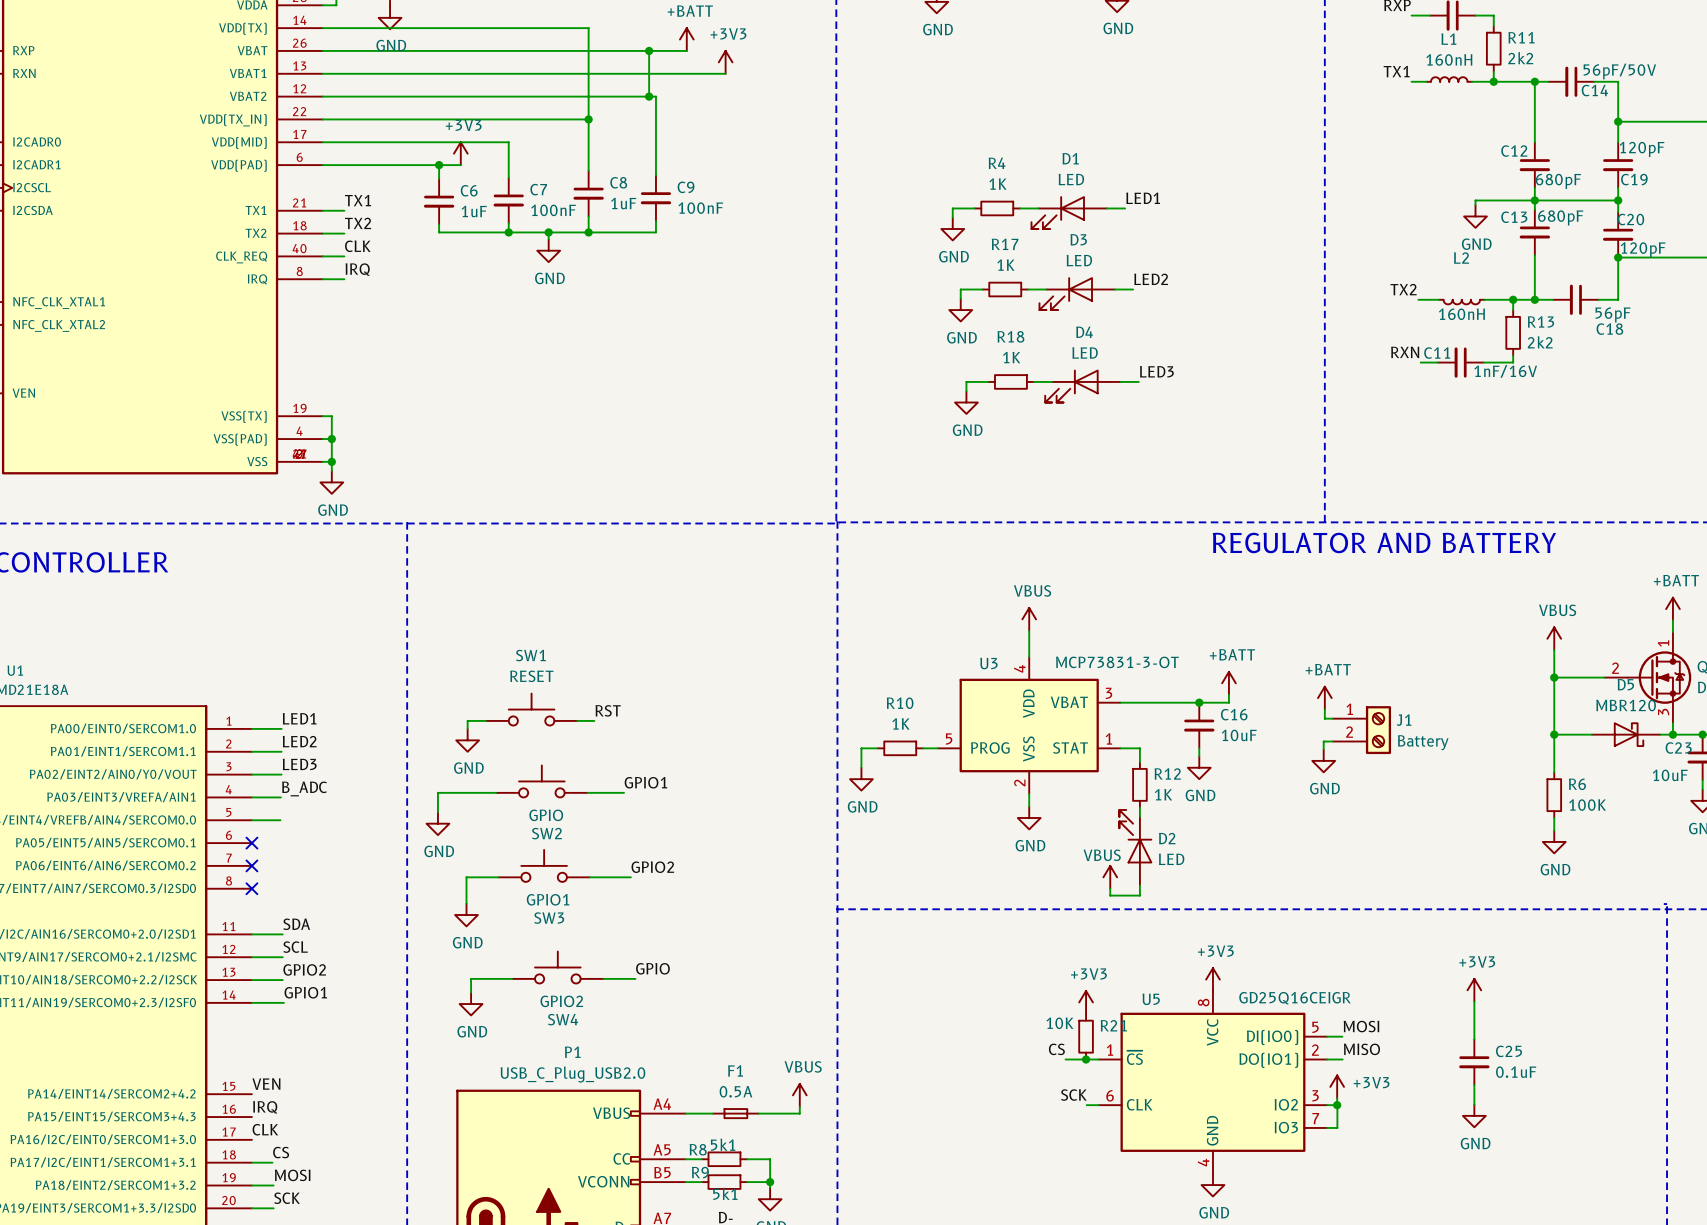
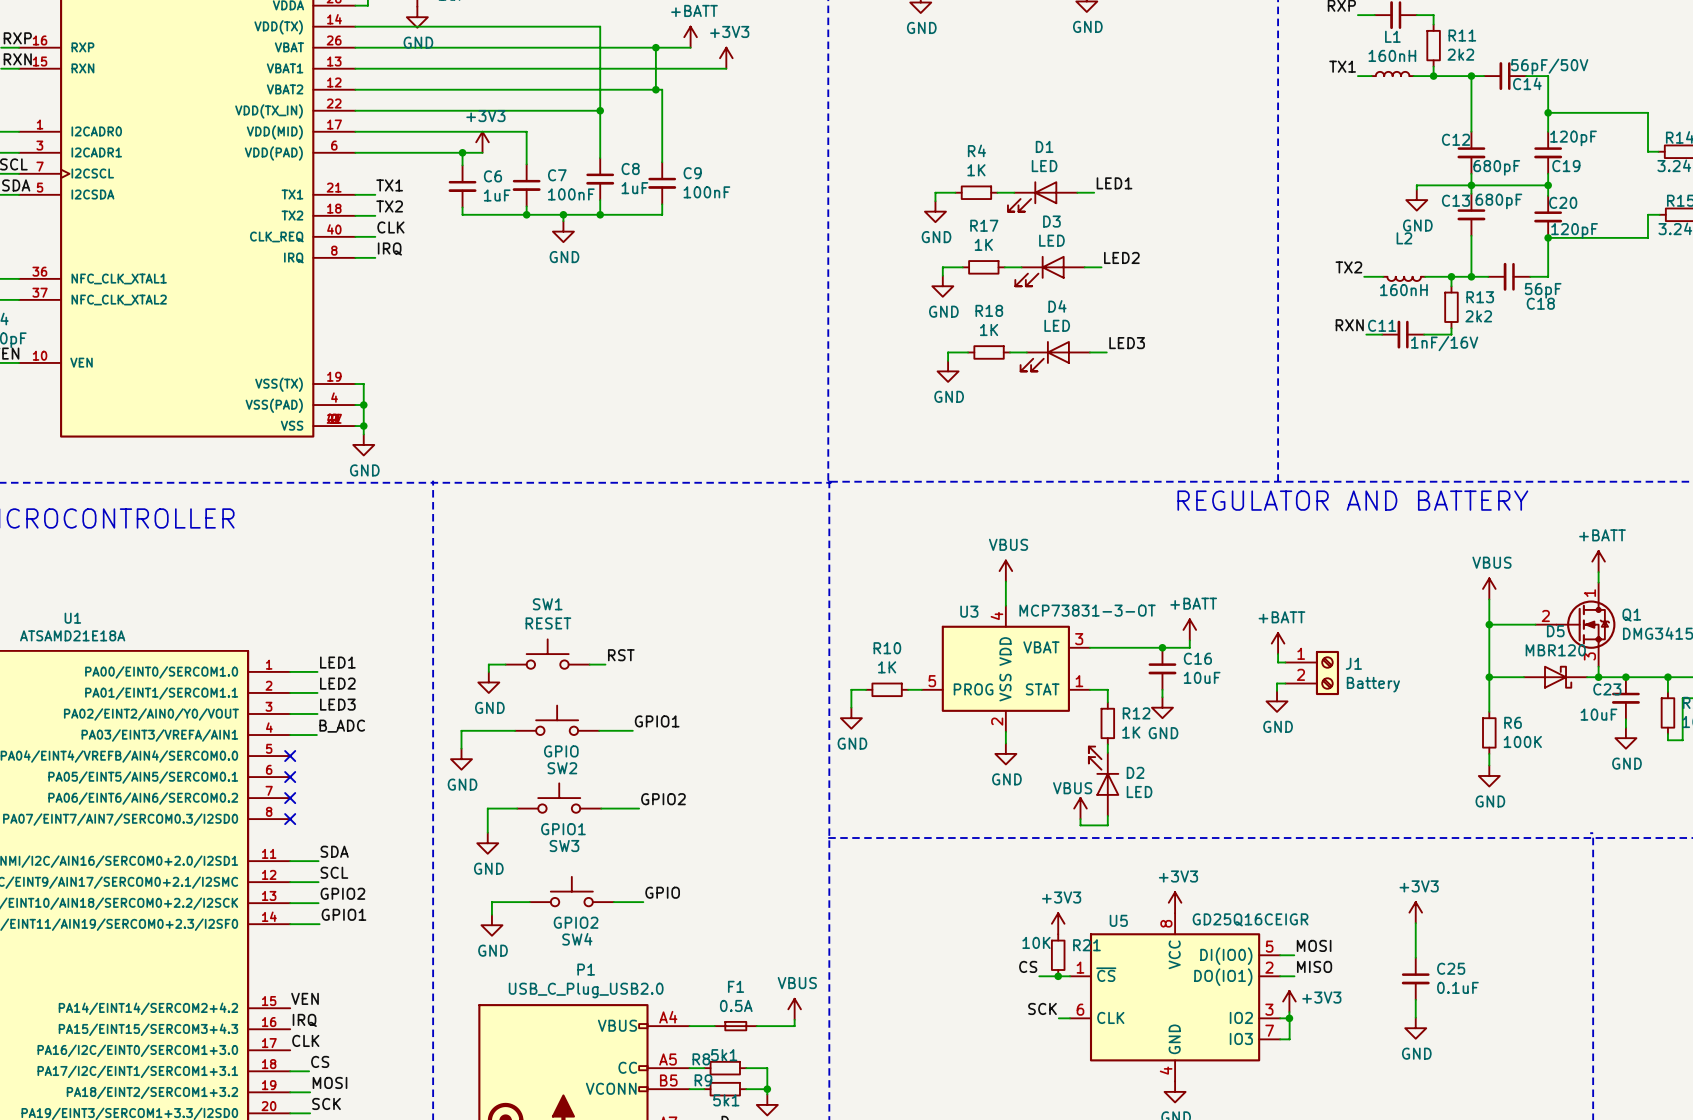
wire: (251, 820) (280, 820) -> none
no-connect mark: none -> (290, 756)

